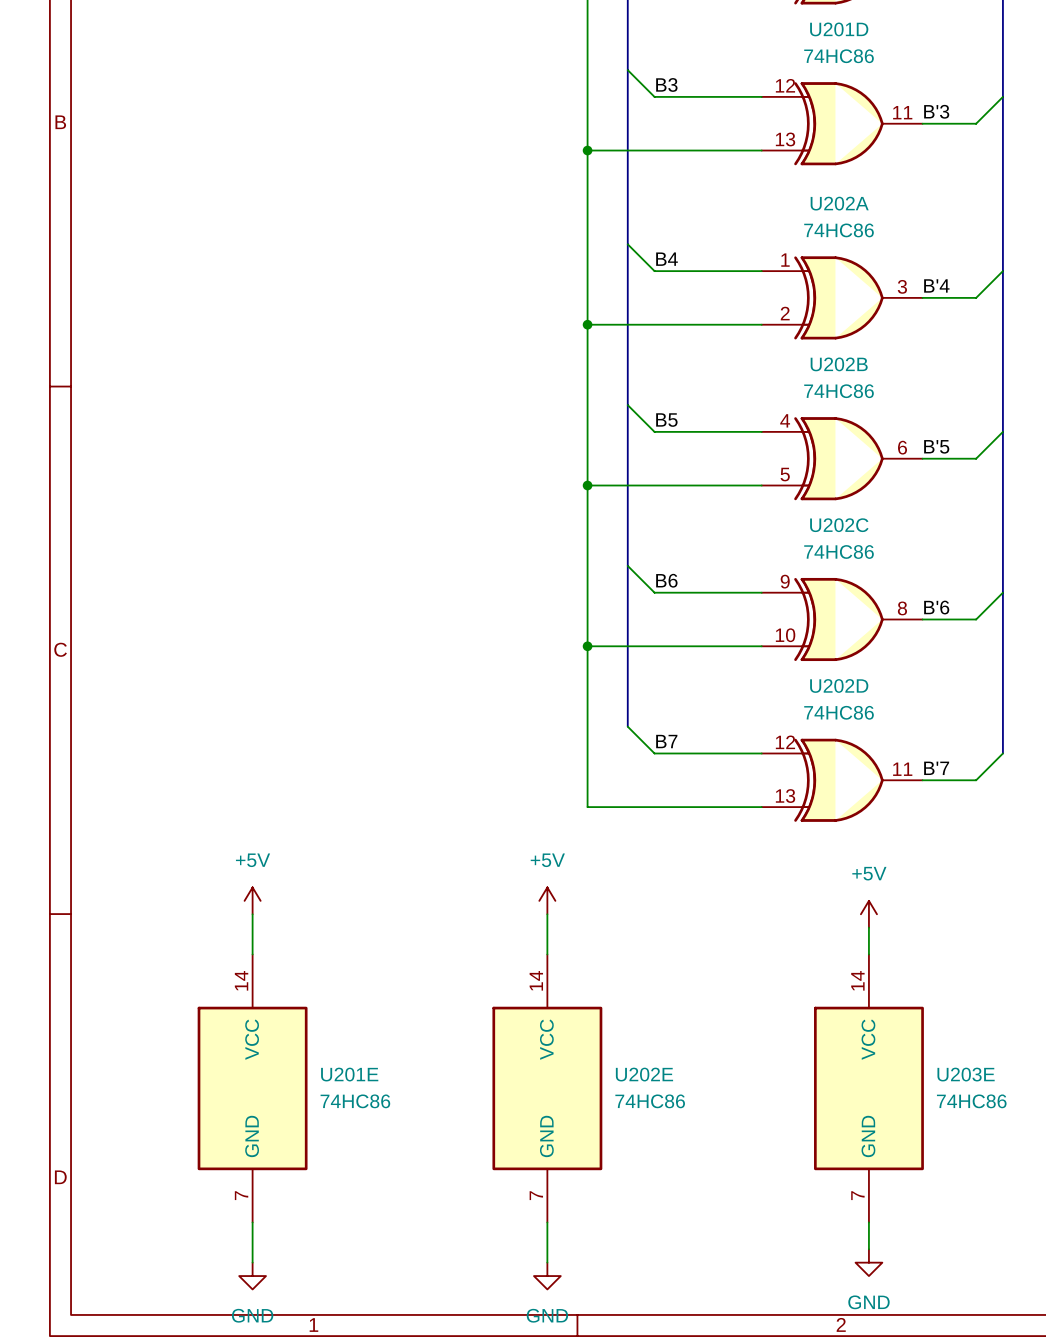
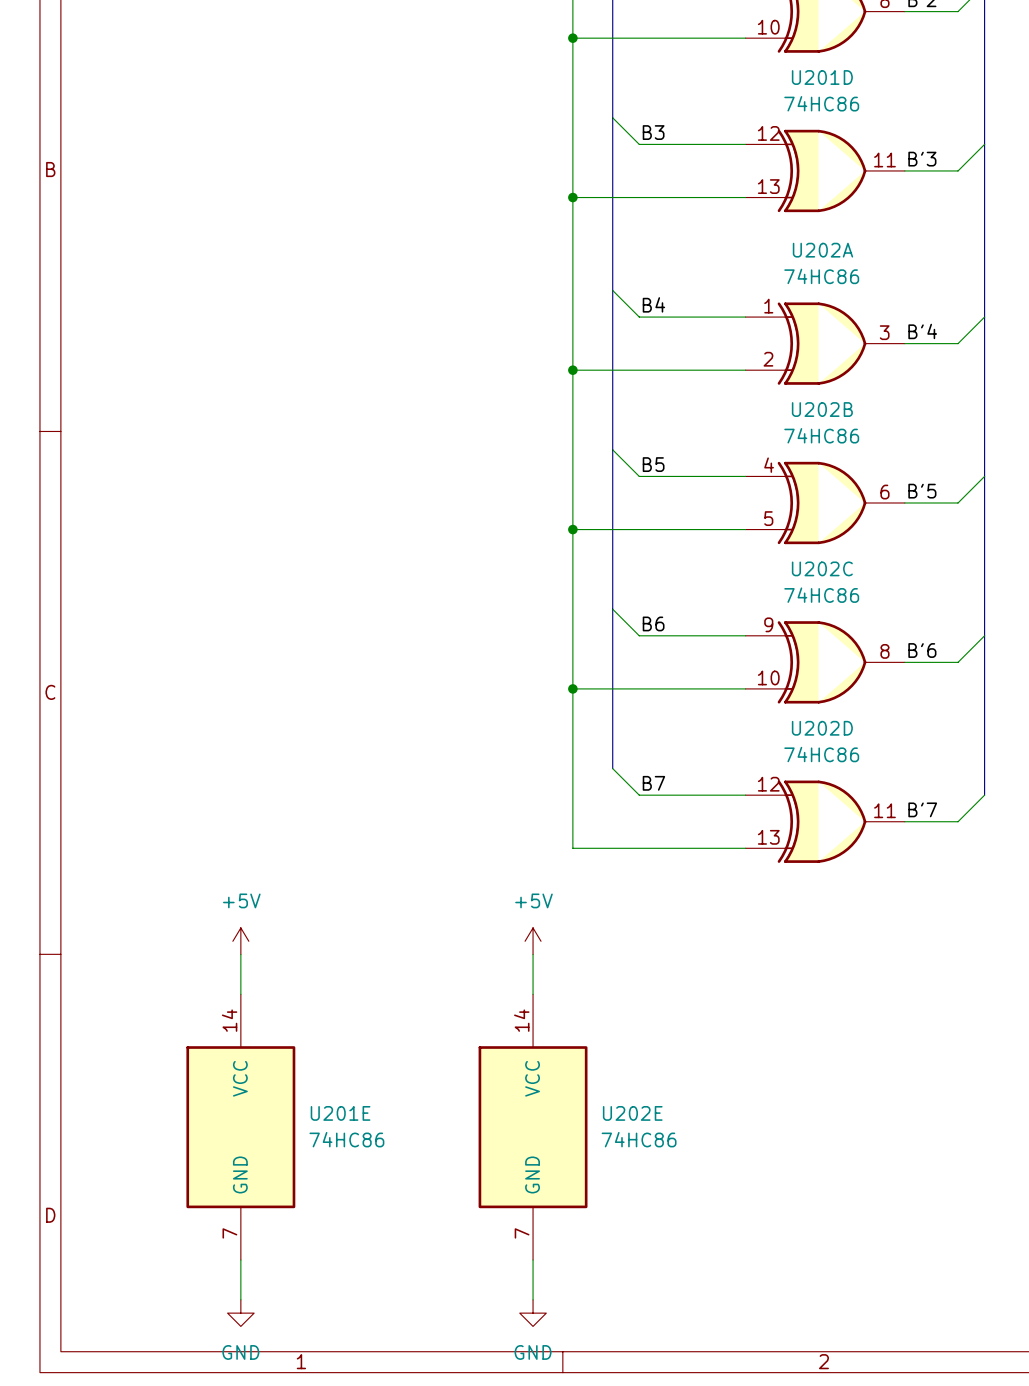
power symbol: +5V (868, 914) -> none
wire: (868, 927) (868, 954) -> none
U203E: 74HC86 (868, 1088) -> none
wire: (868, 1222) (868, 1249) -> none
power symbol: GND (868, 1262) -> none

